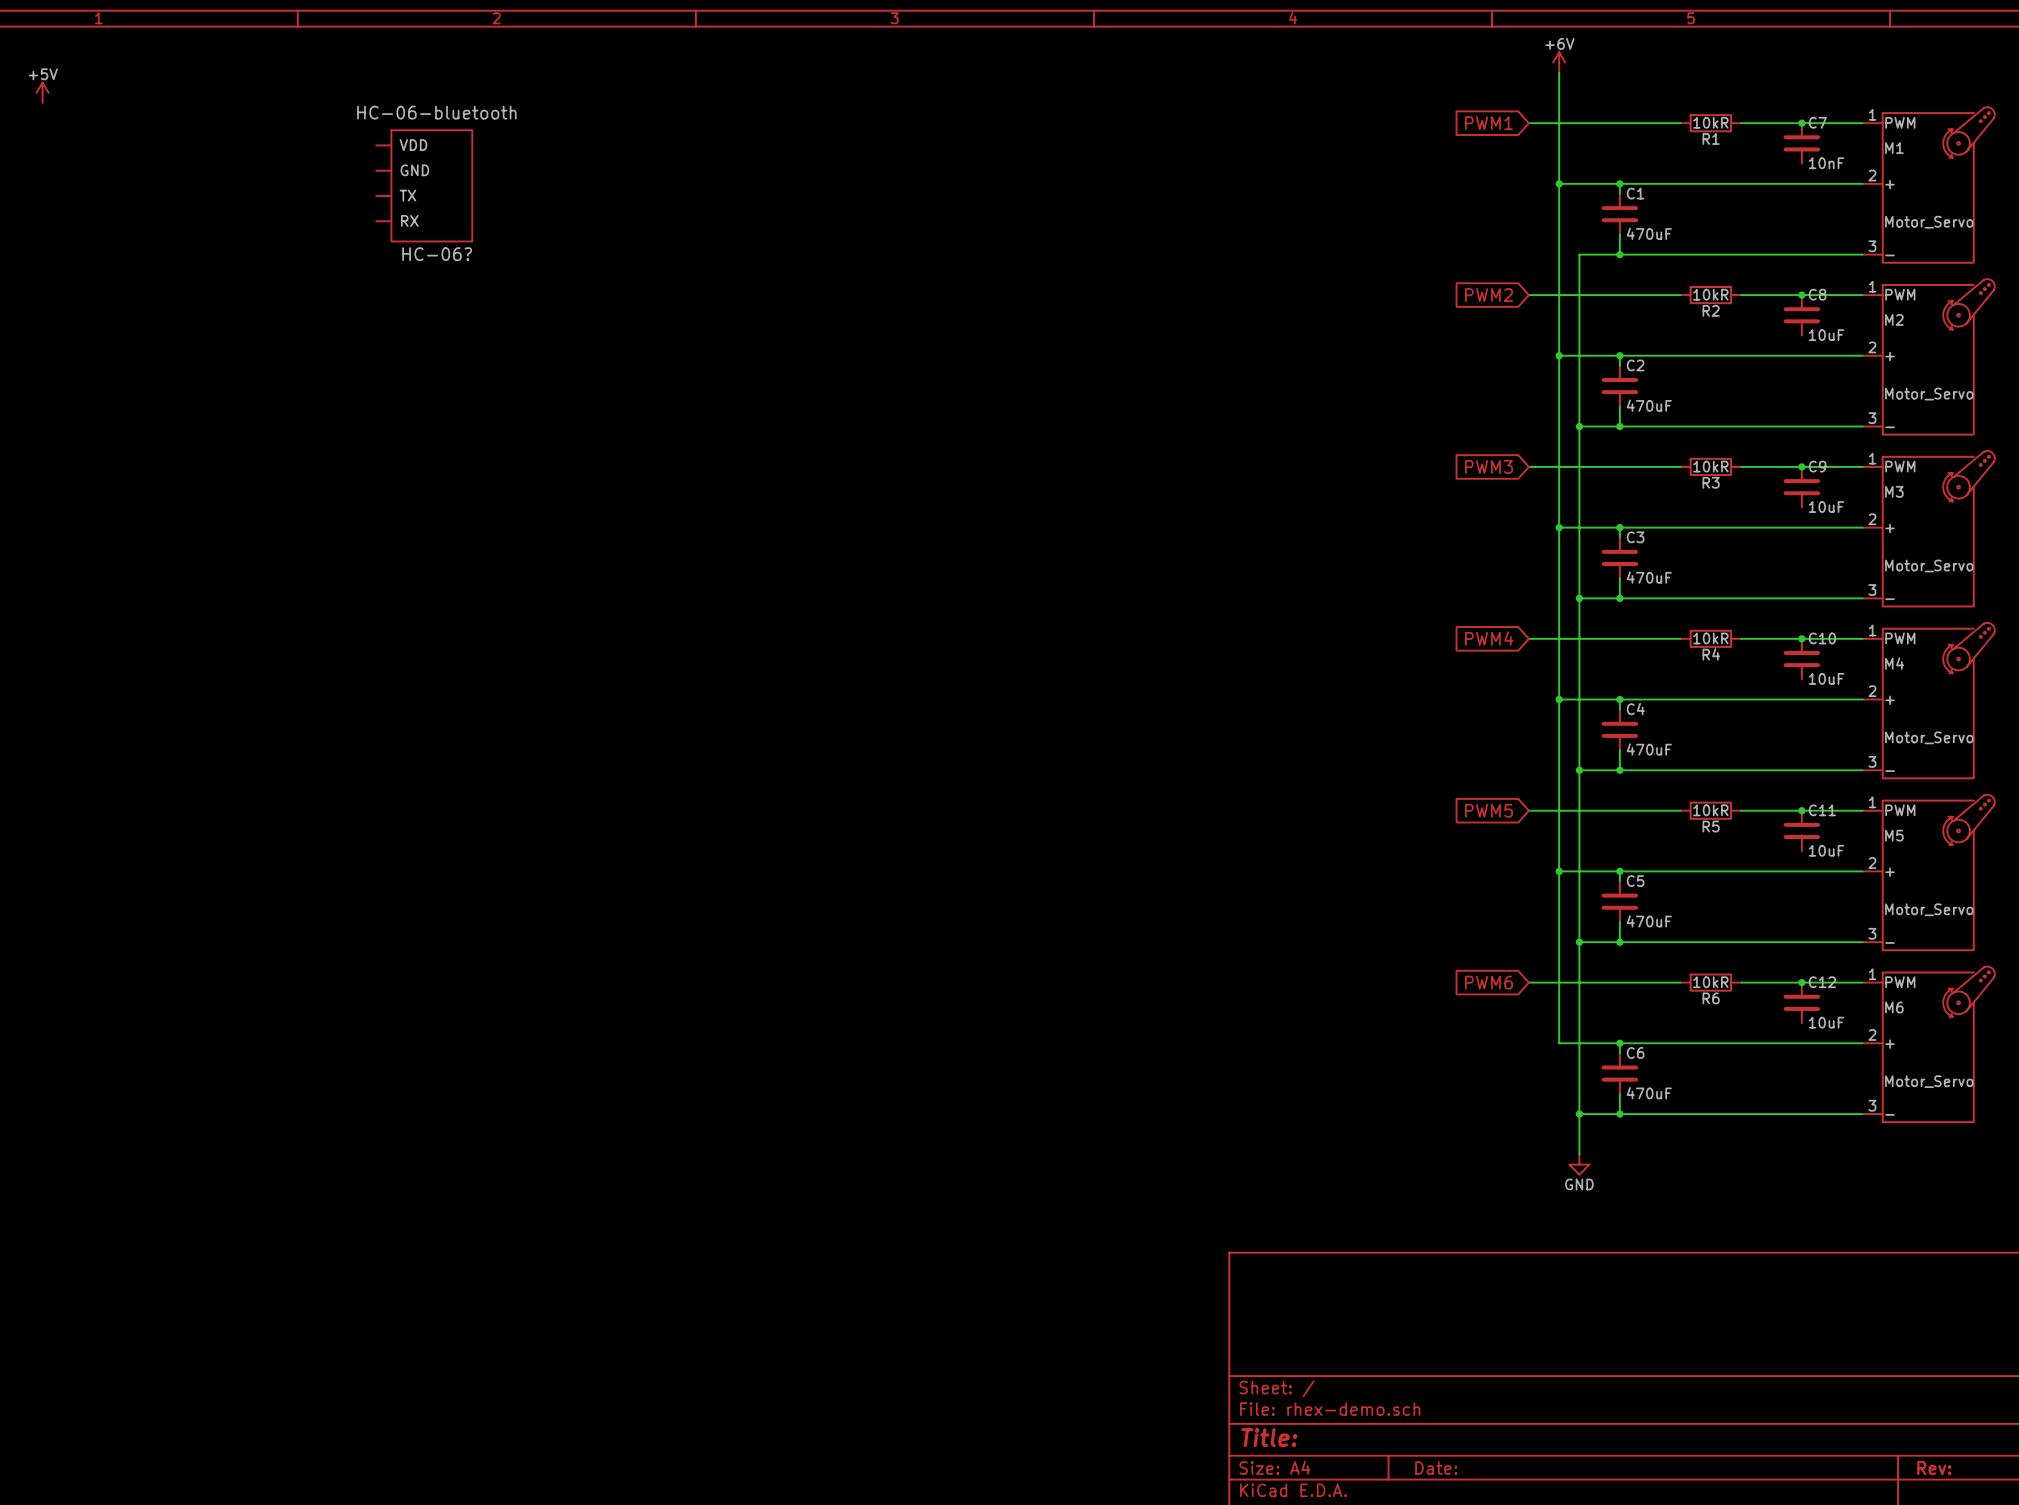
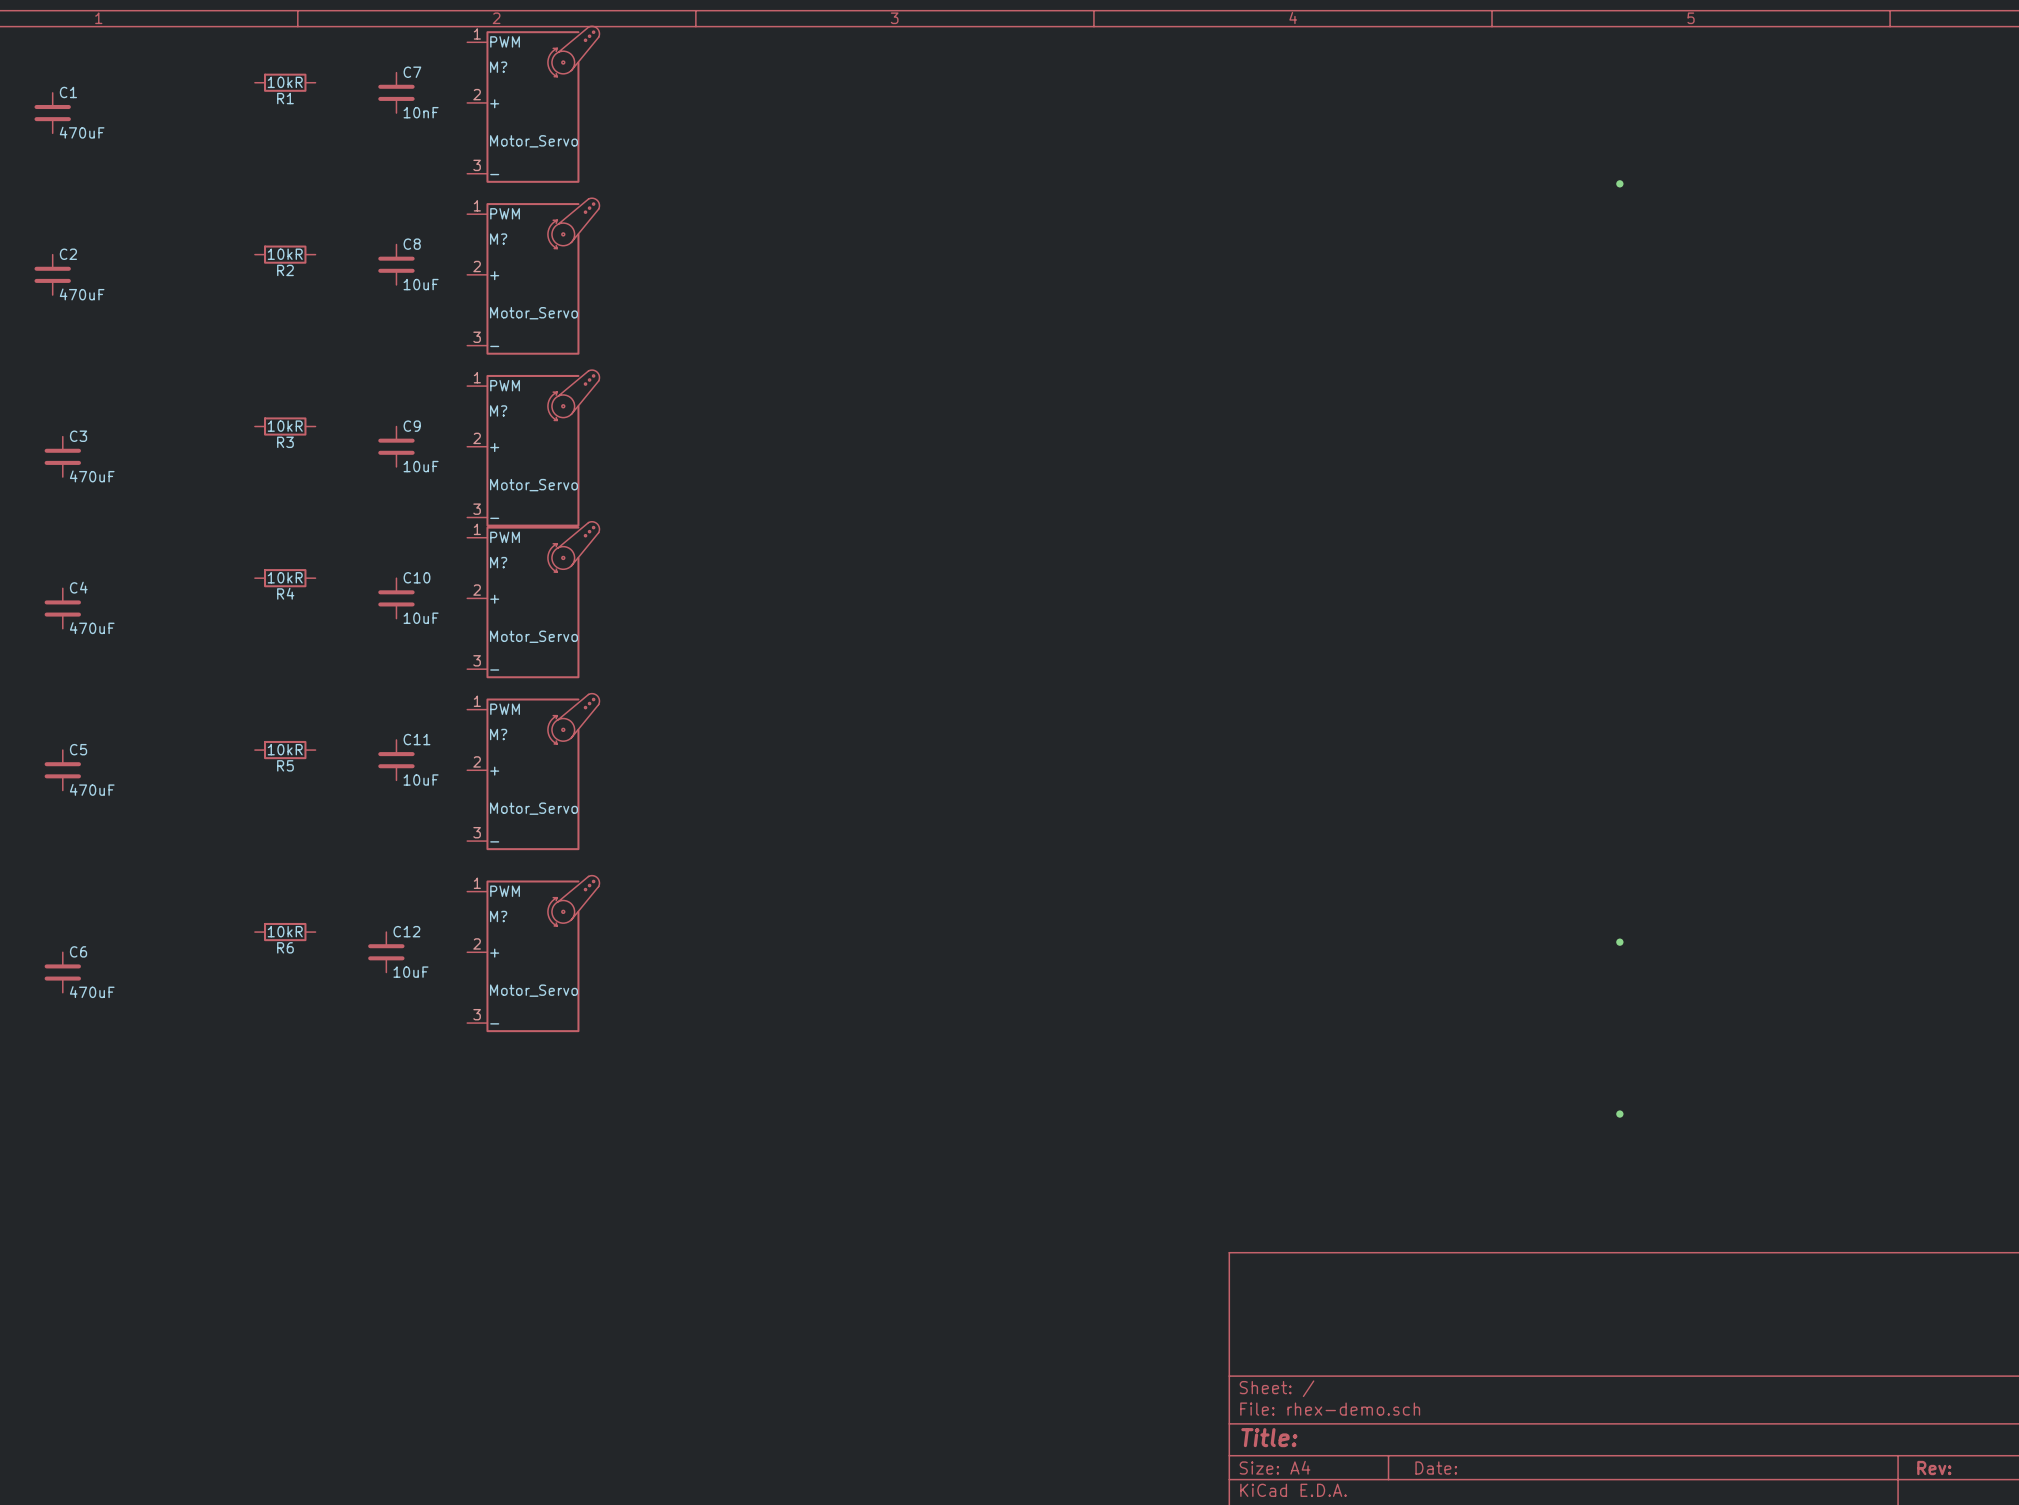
power symbol: +6V (1559, 62) -> none
wire: (1559, 72) (1559, 1043) (1862, 1043) -> none
power symbol: +5V (42, 92) -> none
M?: none -> Motor_Servo (533, 104)
global label: PWM1 (1489, 123) -> none
wire: (1528, 123) (1680, 123) -> none
R1 position: (1710, 123) -> (285, 82)
wire: (1741, 123) (1862, 123) -> none
junction: (1801, 123) -> none
C7 position: (1801, 143) -> (396, 92)
wire: (1559, 183) (1862, 183) -> none
junction: (1559, 183) -> none
wire: (1619, 183) (1619, 193) -> none
HC-06?: HC-06-bluetooth (424, 185) -> none
M1: Motor_Servo (1928, 185) -> none
C1 position: (1619, 214) -> (52, 113)
wire: (1619, 234) (1619, 254) -> none
junction: (1619, 254) -> none
wire: (1862, 254) (1579, 254) (1579, 1154) -> none
M?: none -> Motor_Servo (533, 276)
global label: PWM2 (1489, 295) -> none
wire: (1528, 295) (1680, 295) -> none
R2 position: (1710, 295) -> (285, 254)
wire: (1741, 295) (1862, 295) -> none
junction: (1801, 295) -> none
C8 position: (1801, 315) -> (396, 264)
wire: (1559, 355) (1862, 355) -> none
junction: (1559, 355) -> none
wire: (1619, 355) (1619, 365) -> none
junction: (1619, 355) -> none
M2: Motor_Servo (1928, 357) -> none
C2 position: (1619, 386) -> (52, 274)
wire: (1619, 406) (1619, 426) -> none
wire: (1579, 426) (1862, 426) -> none
junction: (1579, 426) -> none
junction: (1619, 426) -> none
M?: none -> Motor_Servo (533, 448)
global label: PWM3 (1489, 466) -> none
wire: (1528, 466) (1680, 466) -> none
R3 position: (1710, 466) -> (285, 426)
wire: (1741, 466) (1862, 466) -> none
junction: (1801, 466) -> none
C9 position: (1801, 487) -> (396, 446)
wire: (1559, 527) (1862, 527) -> none
junction: (1559, 527) -> none
wire: (1619, 527) (1619, 537) -> none
junction: (1619, 527) -> none
M3: Motor_Servo (1928, 529) -> none
C3 position: (1619, 557) -> (62, 456)
wire: (1619, 578) (1619, 598) -> none
wire: (1579, 598) (1862, 598) -> none
junction: (1579, 598) -> none
junction: (1619, 598) -> none
M?: none -> Motor_Servo (533, 600)
global label: PWM4 (1489, 638) -> none
wire: (1528, 638) (1680, 638) -> none
R4 position: (1710, 638) -> (285, 578)
wire: (1741, 638) (1862, 638) -> none
junction: (1801, 638) -> none
C10 position: (1801, 659) -> (396, 598)
wire: (1559, 699) (1862, 699) -> none
junction: (1559, 699) -> none
wire: (1619, 699) (1619, 709) -> none
junction: (1619, 699) -> none
M4: Motor_Servo (1928, 701) -> none
C4 position: (1619, 729) -> (62, 608)
wire: (1619, 750) (1619, 770) -> none
wire: (1579, 770) (1862, 770) -> none
junction: (1579, 770) -> none
junction: (1619, 770) -> none
M?: none -> Motor_Servo (533, 771)
global label: PWM5 (1489, 810) -> none
wire: (1528, 810) (1680, 810) -> none
R5 position: (1710, 810) -> (285, 750)
wire: (1741, 810) (1862, 810) -> none
junction: (1801, 810) -> none
C11 position: (1801, 830) -> (396, 760)
wire: (1559, 871) (1862, 871) -> none
junction: (1559, 871) -> none
wire: (1619, 871) (1619, 881) -> none
junction: (1619, 871) -> none
M5: Motor_Servo (1928, 873) -> none
C5 position: (1619, 901) -> (62, 770)
wire: (1619, 921) (1619, 942) -> none
wire: (1579, 942) (1862, 942) -> none
junction: (1579, 942) -> none
M?: none -> Motor_Servo (533, 953)
global label: PWM6 (1489, 982) -> none
wire: (1528, 982) (1680, 982) -> none
R6 position: (1710, 982) -> (285, 932)
wire: (1741, 982) (1862, 982) -> none
junction: (1801, 982) -> none
C12 position: (1801, 1002) -> (386, 952)
wire: (1619, 1043) (1619, 1053) -> none
junction: (1619, 1043) -> none
M6: Motor_Servo (1928, 1044) -> none
C6 position: (1619, 1073) -> (62, 972)
wire: (1619, 1093) (1619, 1114) -> none
wire: (1579, 1114) (1862, 1114) -> none
junction: (1579, 1114) -> none
power symbol: GND (1579, 1164) -> none

